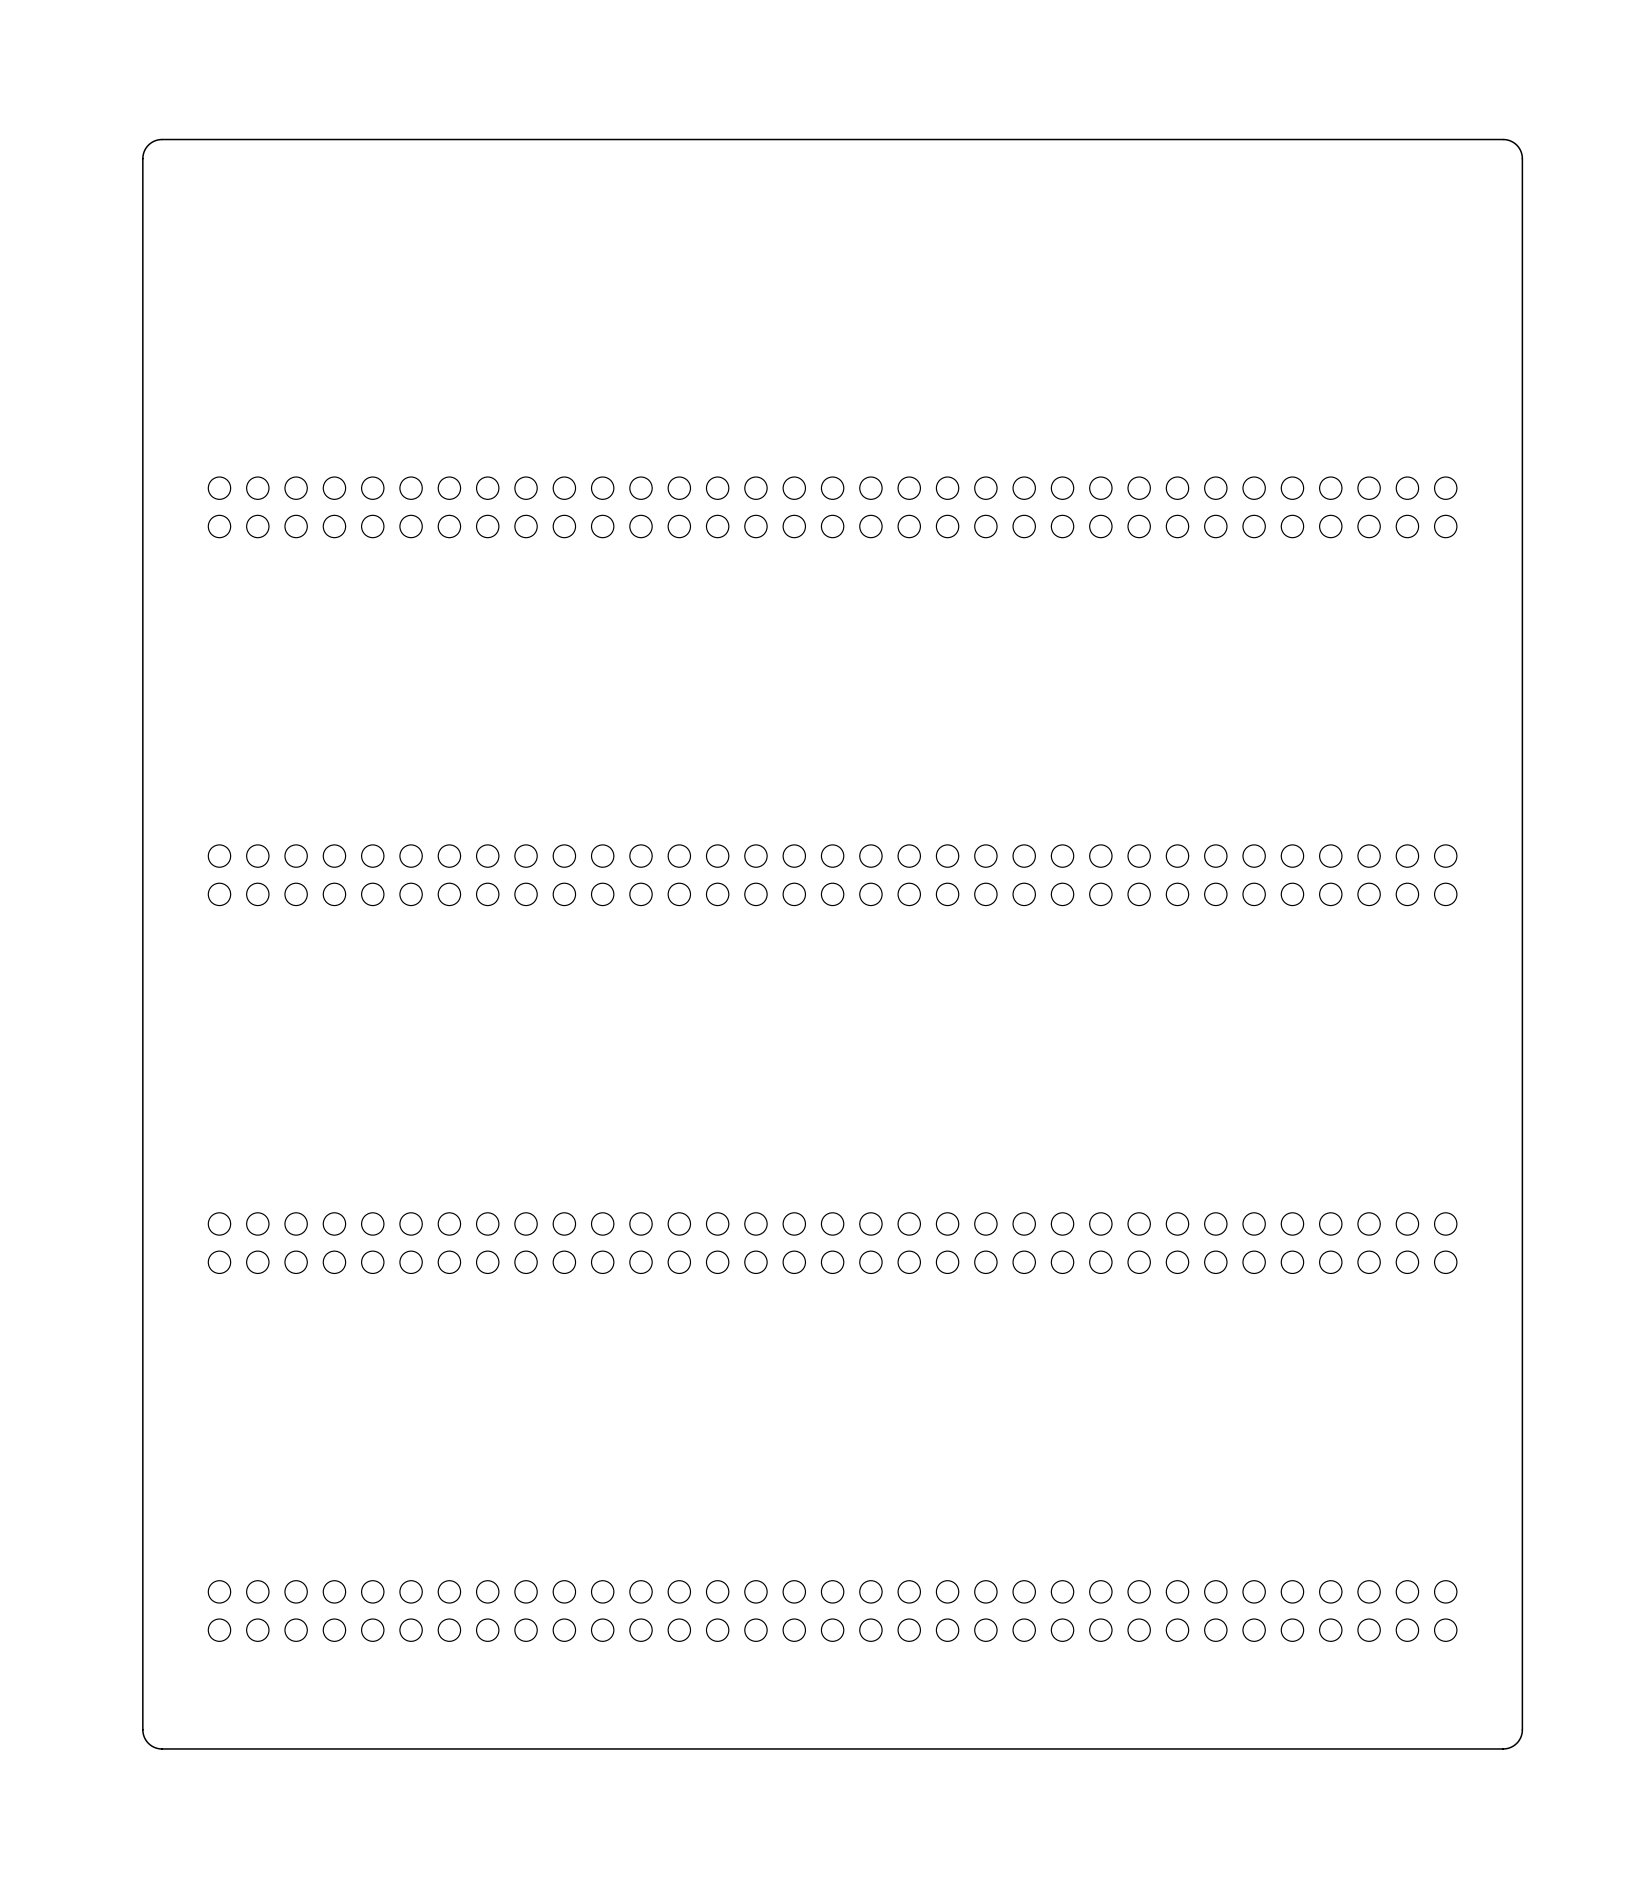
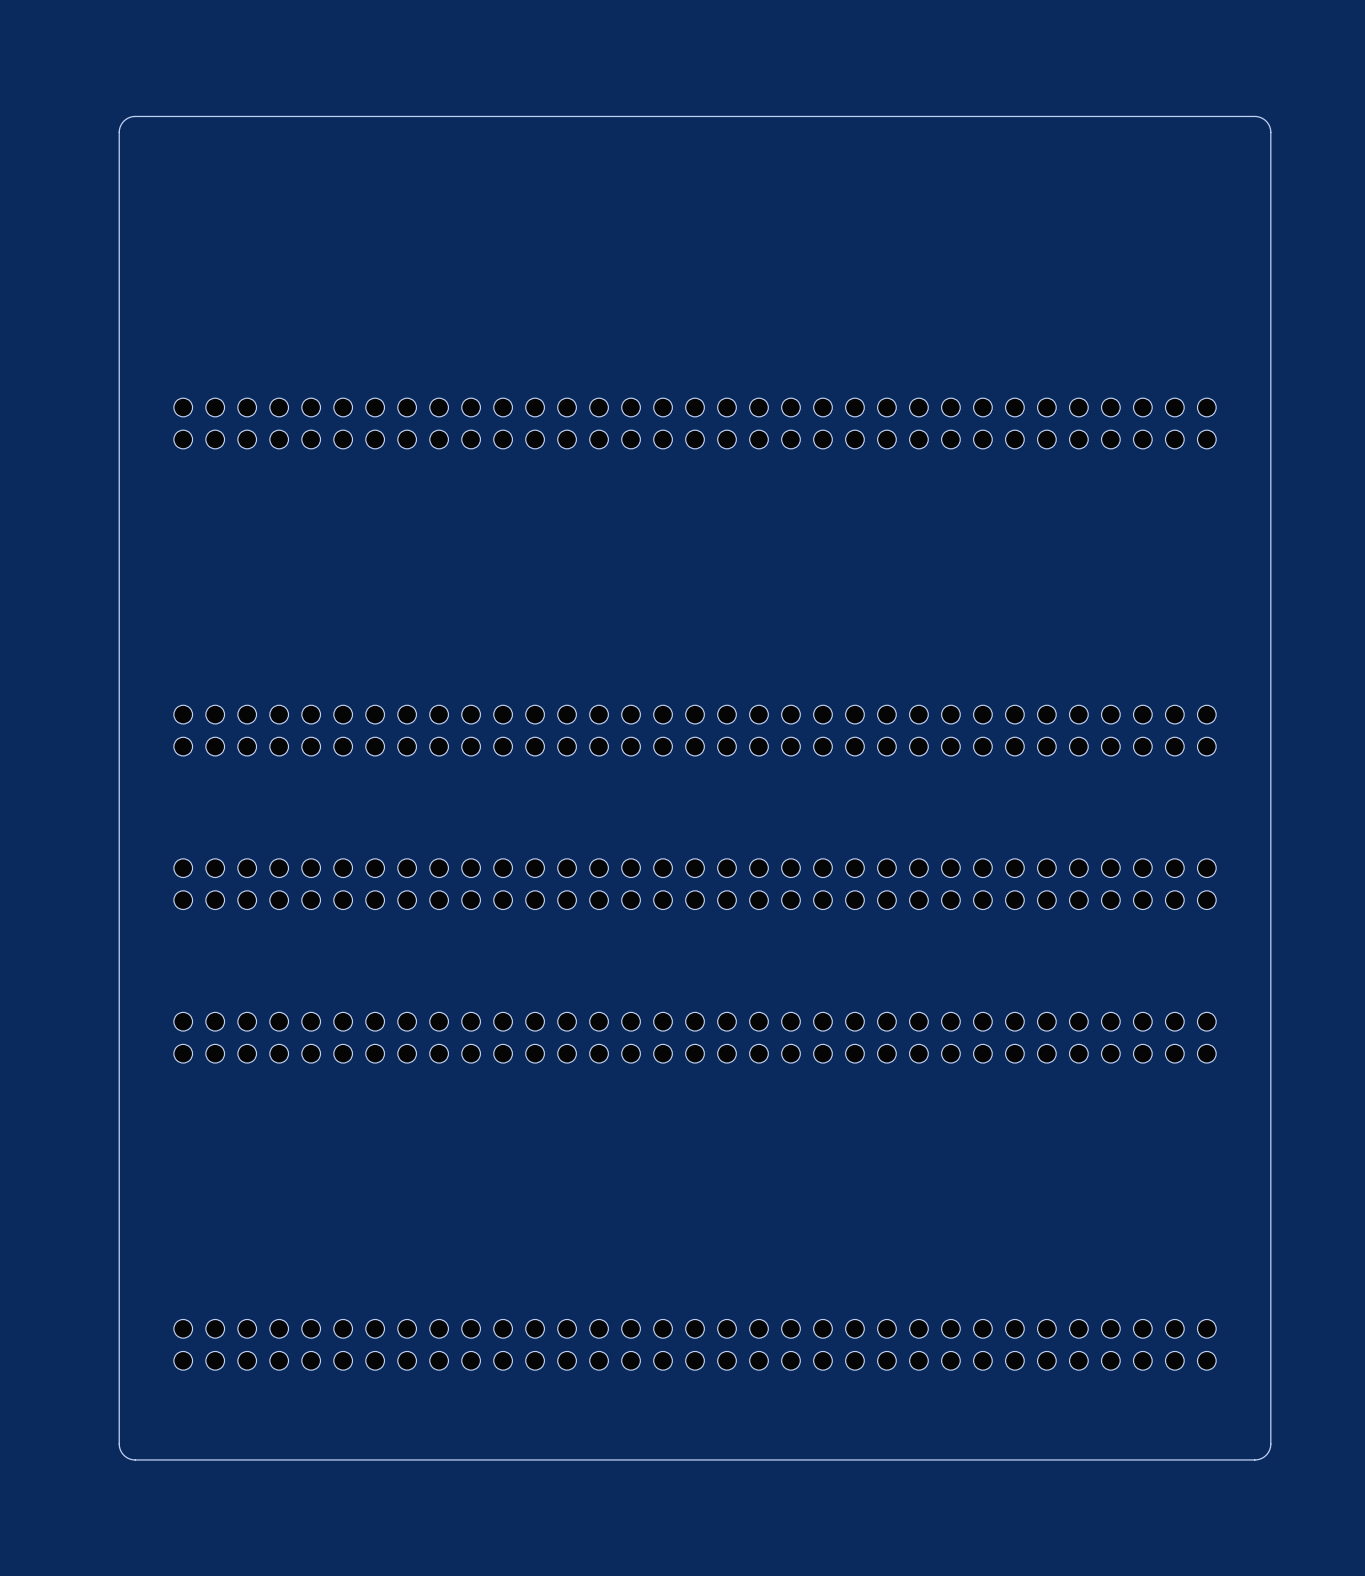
part: none -> (695, 884)

